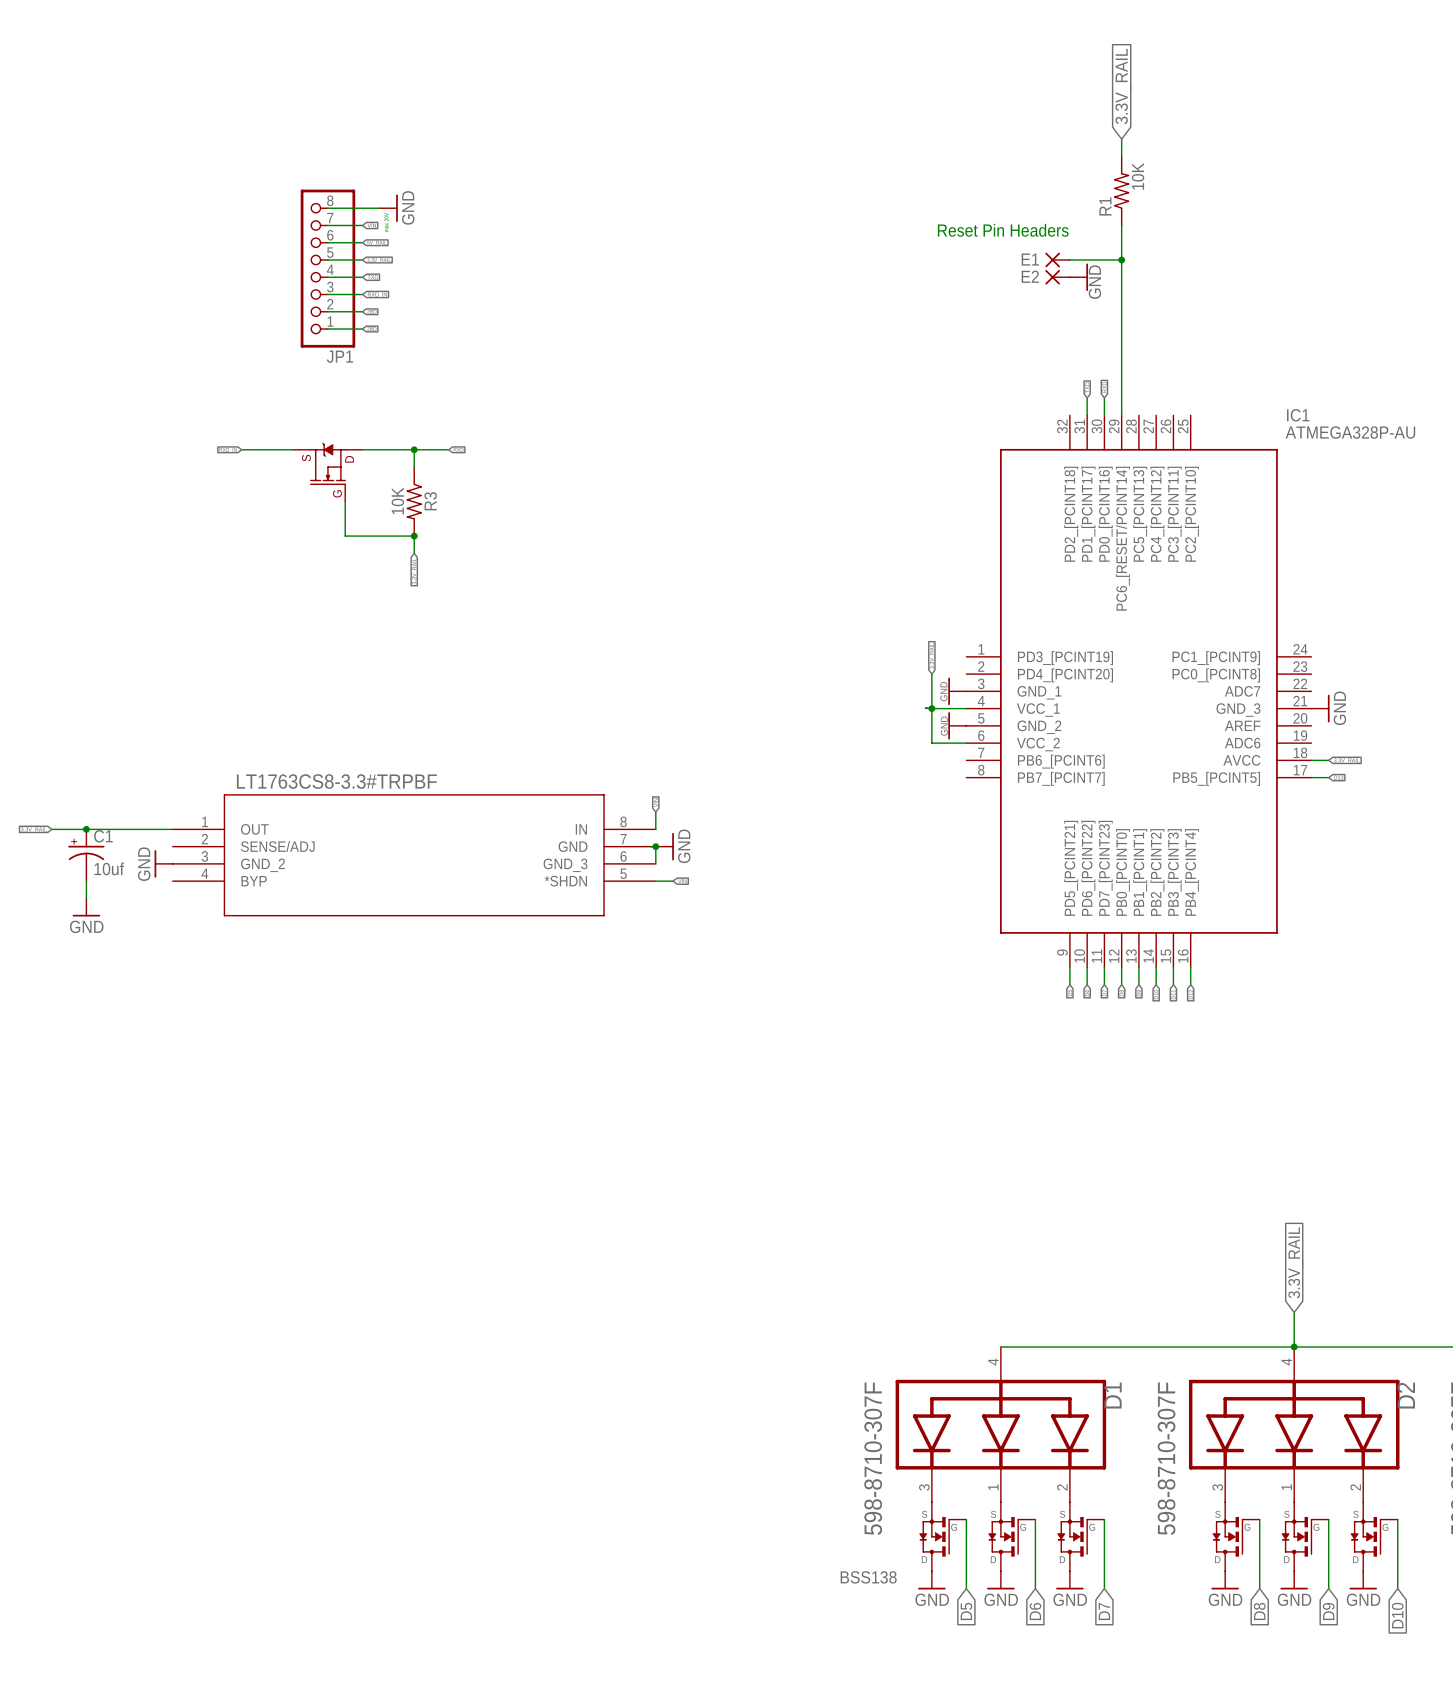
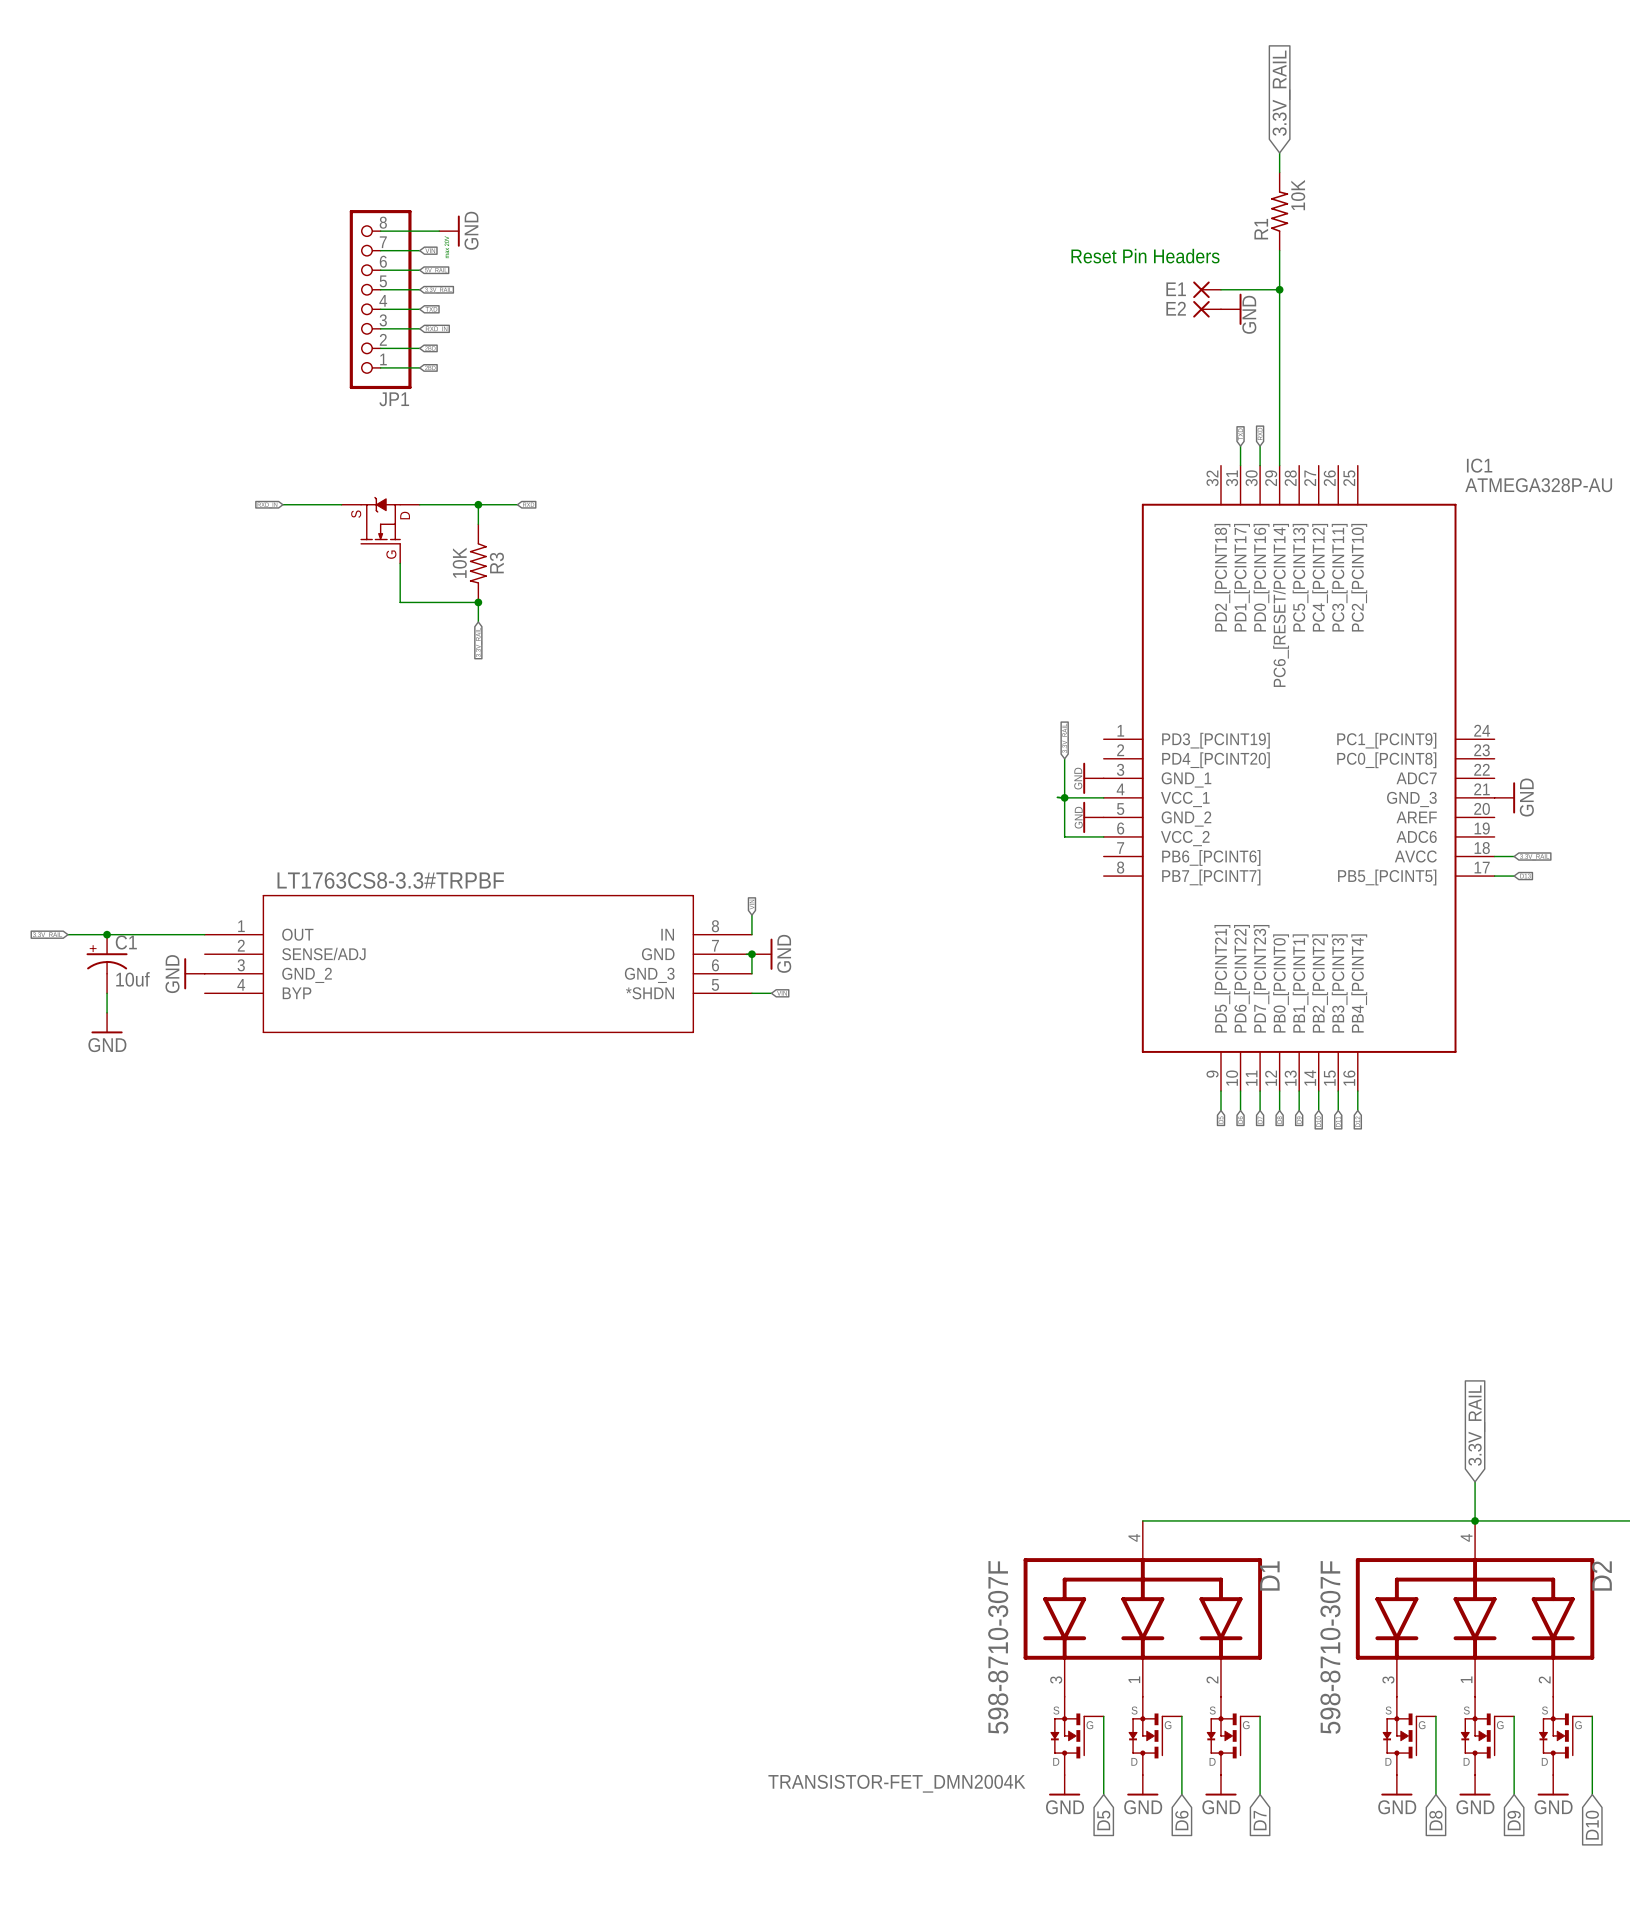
part value: BSS138 (868, 1577) -> TRANSISTOR-FET_DMN2004K (896, 1783)

